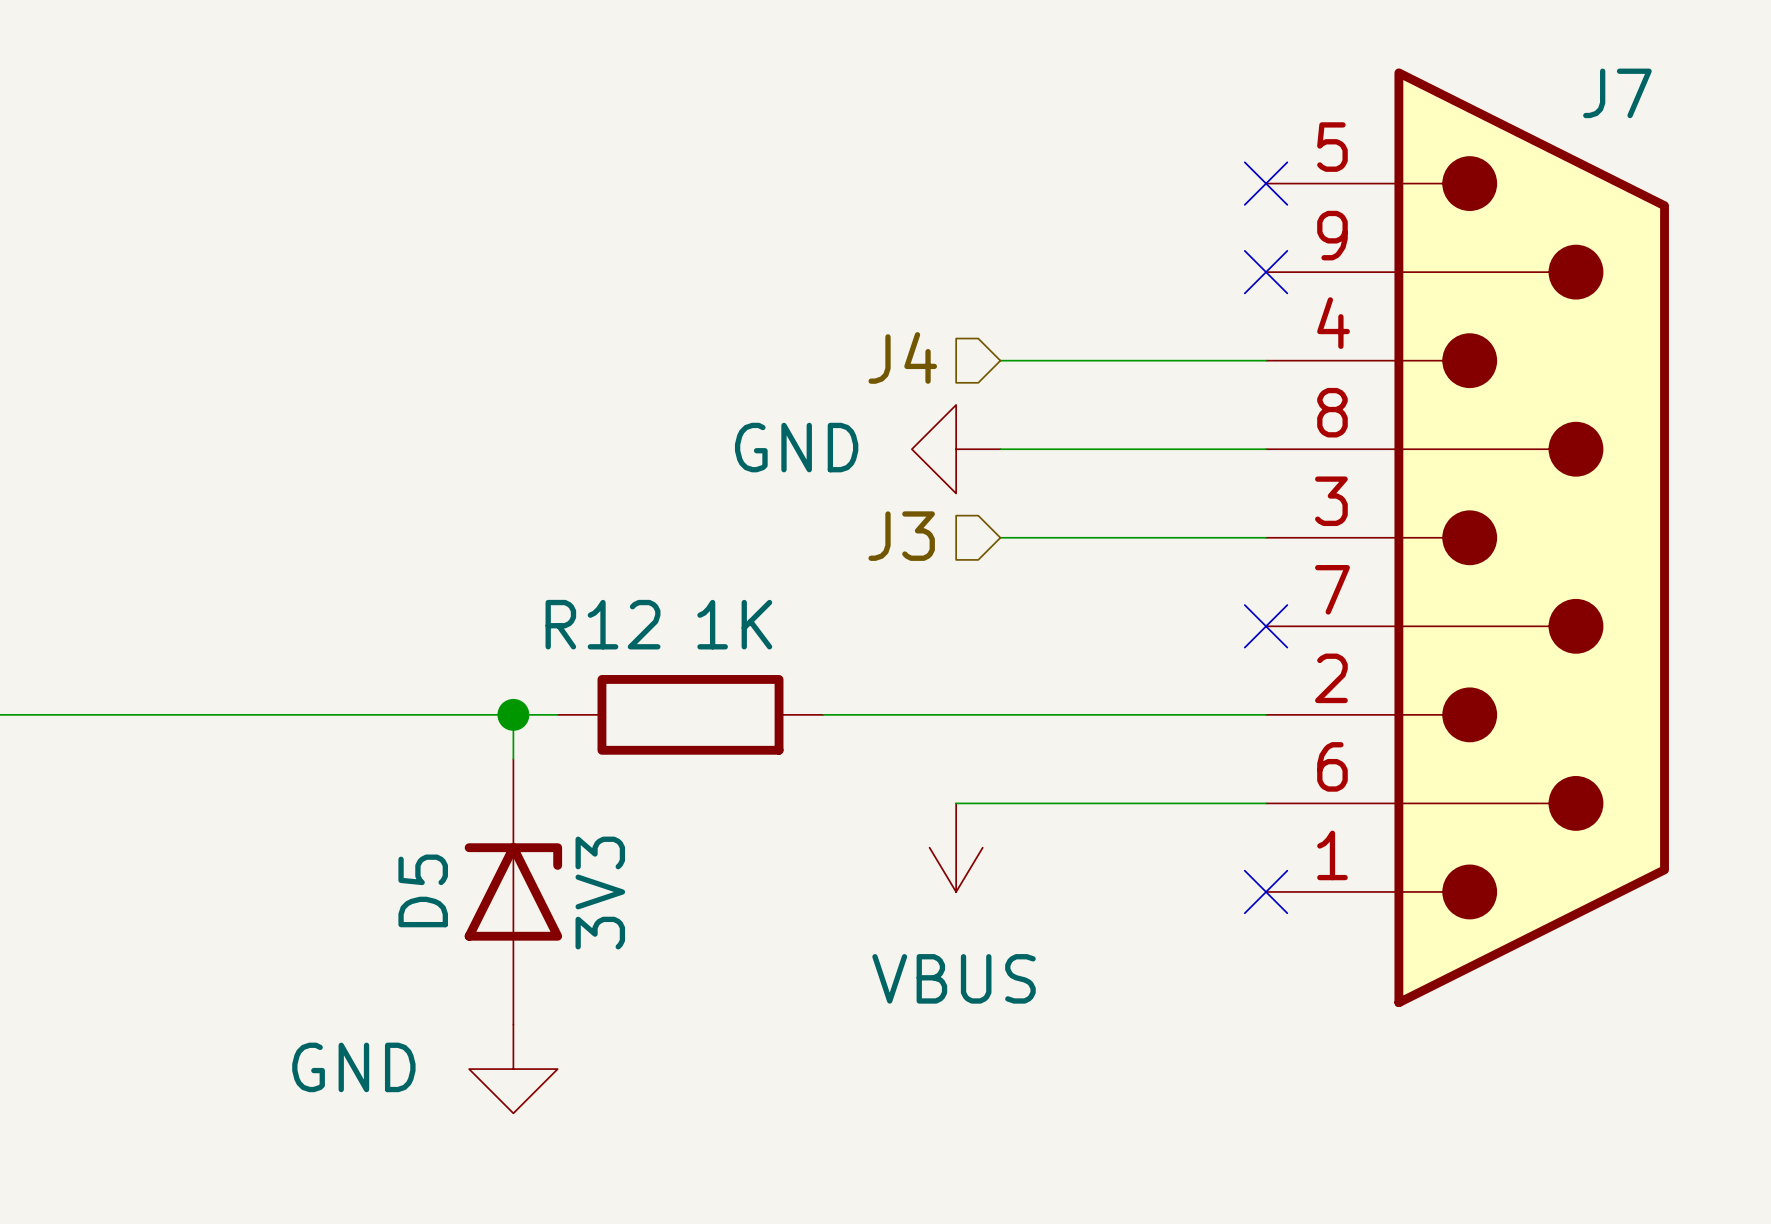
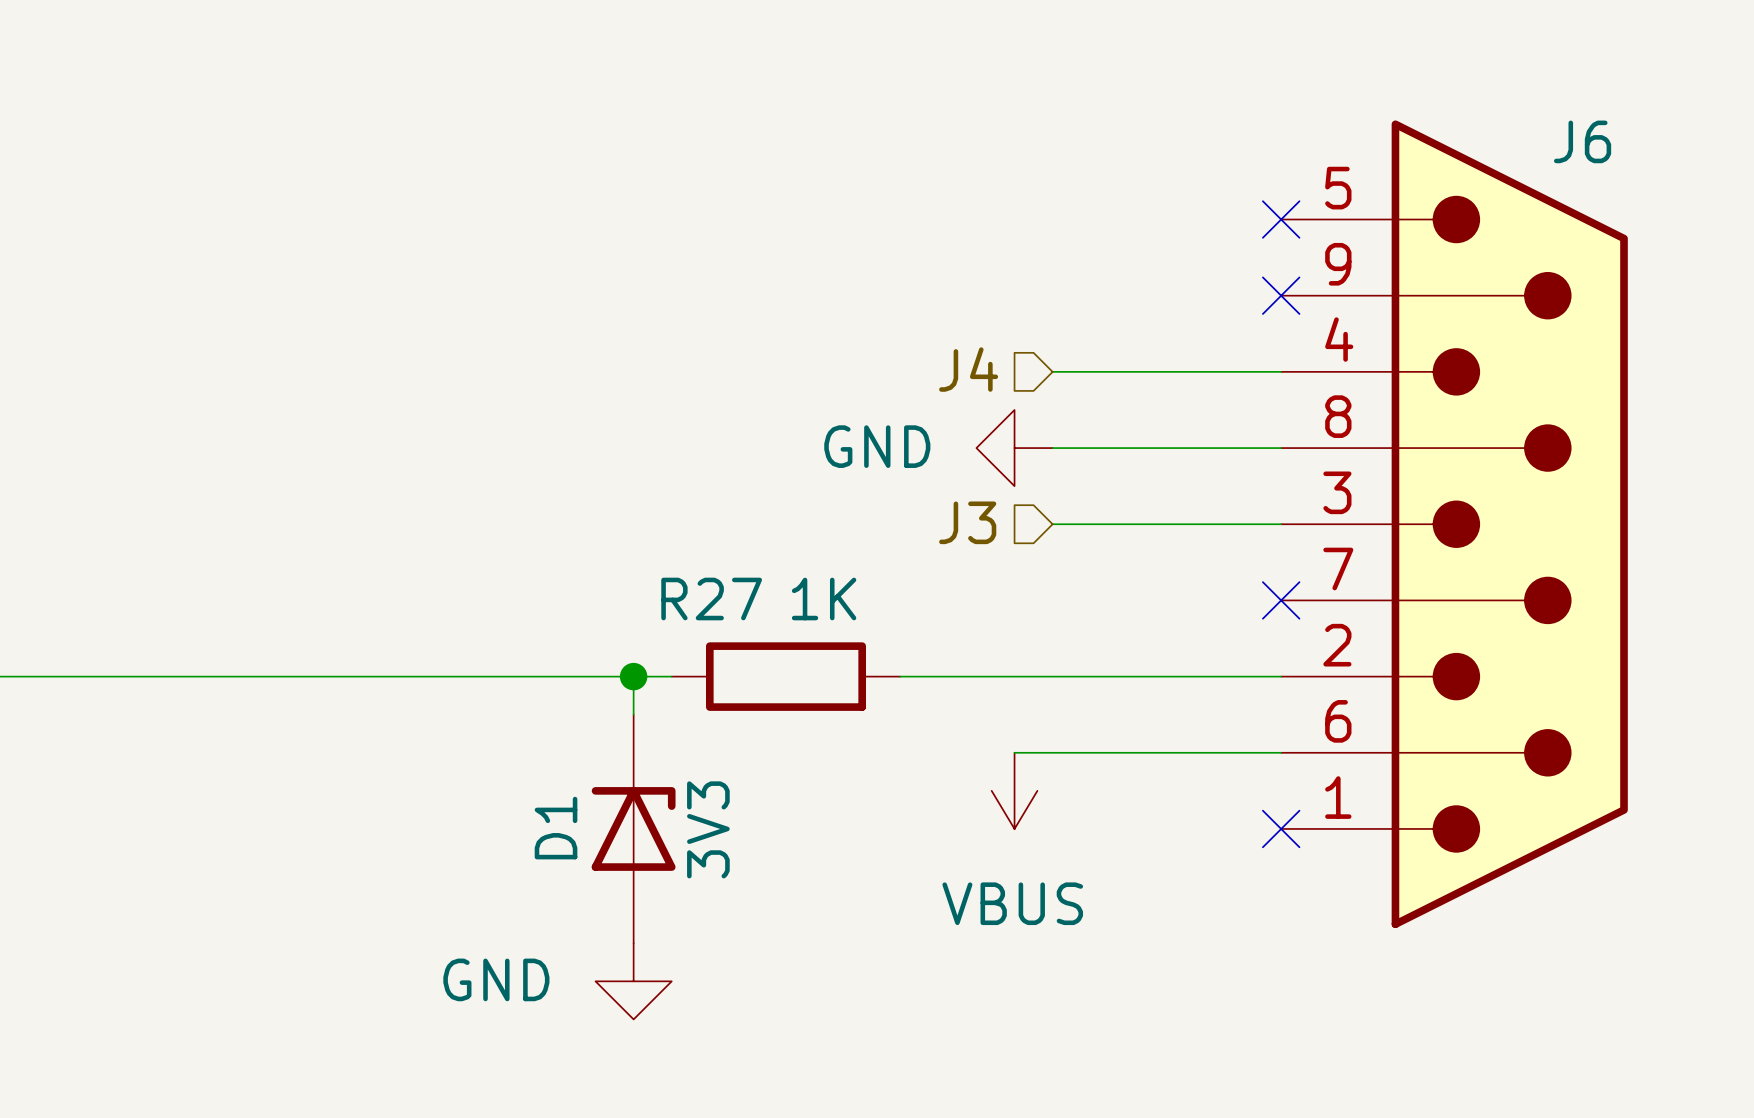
J7 name: J7 (1617, 93) -> J6 (1582, 141)
R12 name: R12 (603, 624) -> R27 (711, 599)
D5 name: D5 (423, 890) -> D1 (556, 828)

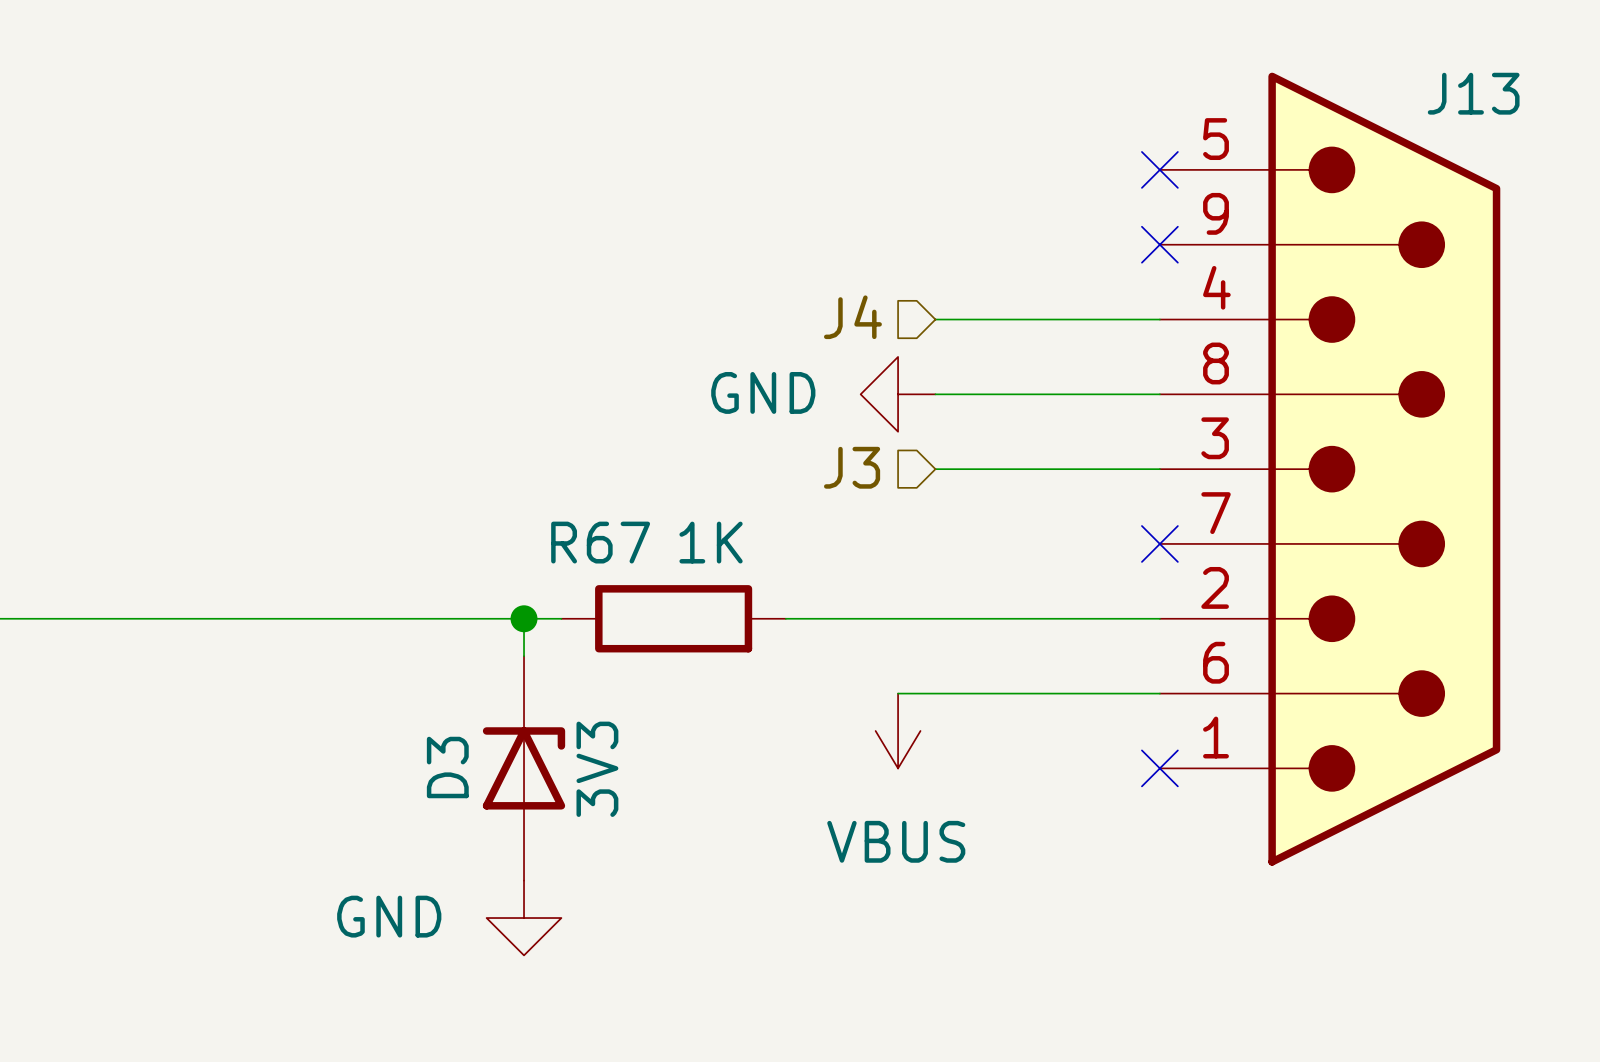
J6 name: J6 (1582, 141) -> J13 (1473, 93)
R27 name: R27 (711, 599) -> R67 (600, 542)
D1 name: D1 (556, 828) -> D3 (447, 767)

